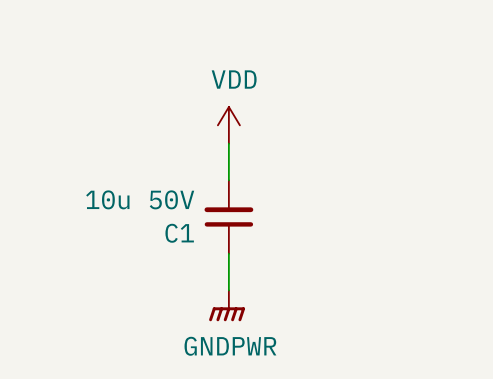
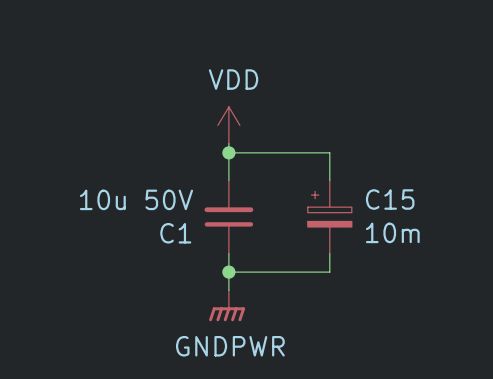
wire: none -> (228, 152) (329, 152) (329, 180)
junction: none -> (228, 152)
C15: none -> 10m (329, 217)
wire: none -> (329, 253) (329, 272) (228, 272)
junction: none -> (228, 272)

